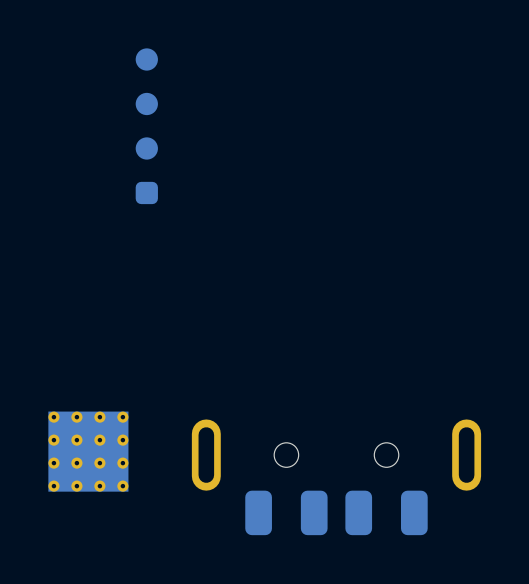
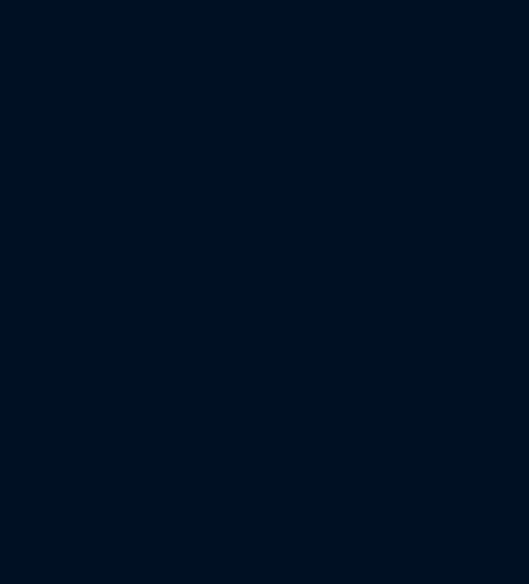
part: (146, 59) -> none
part: (146, 103) -> none
part: (146, 148) -> none
part: (146, 192) -> none
part: (88, 451) -> none
part: (336, 477) -> none

